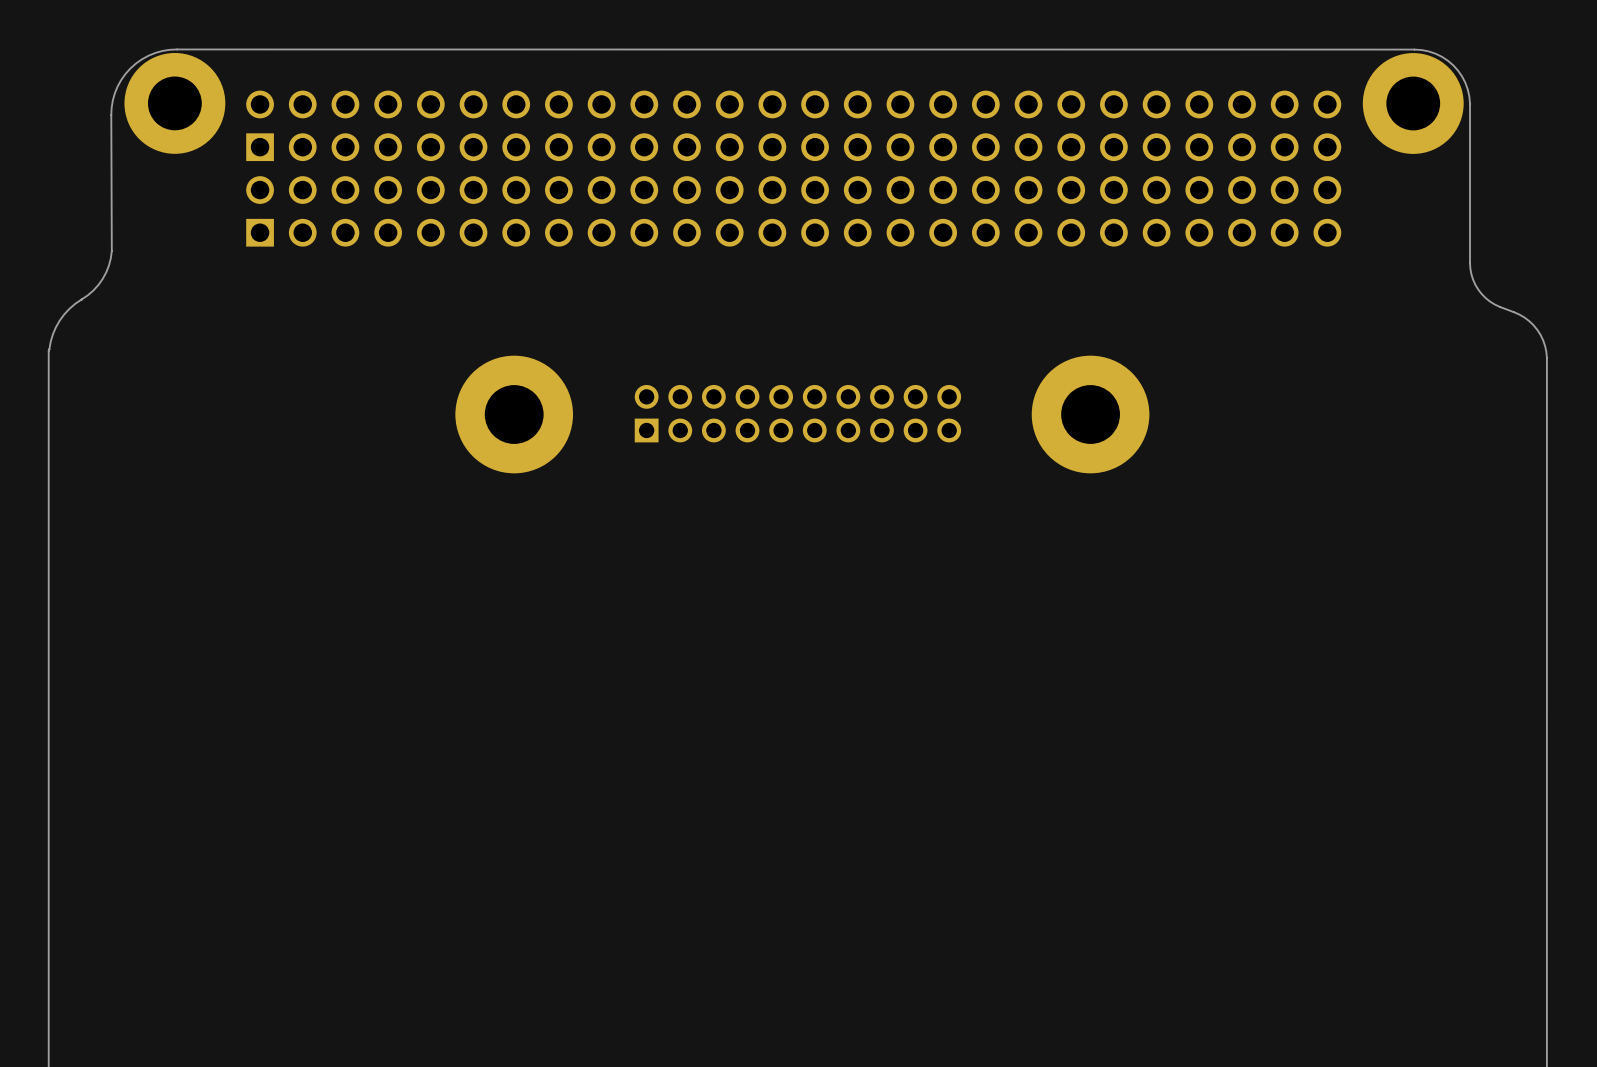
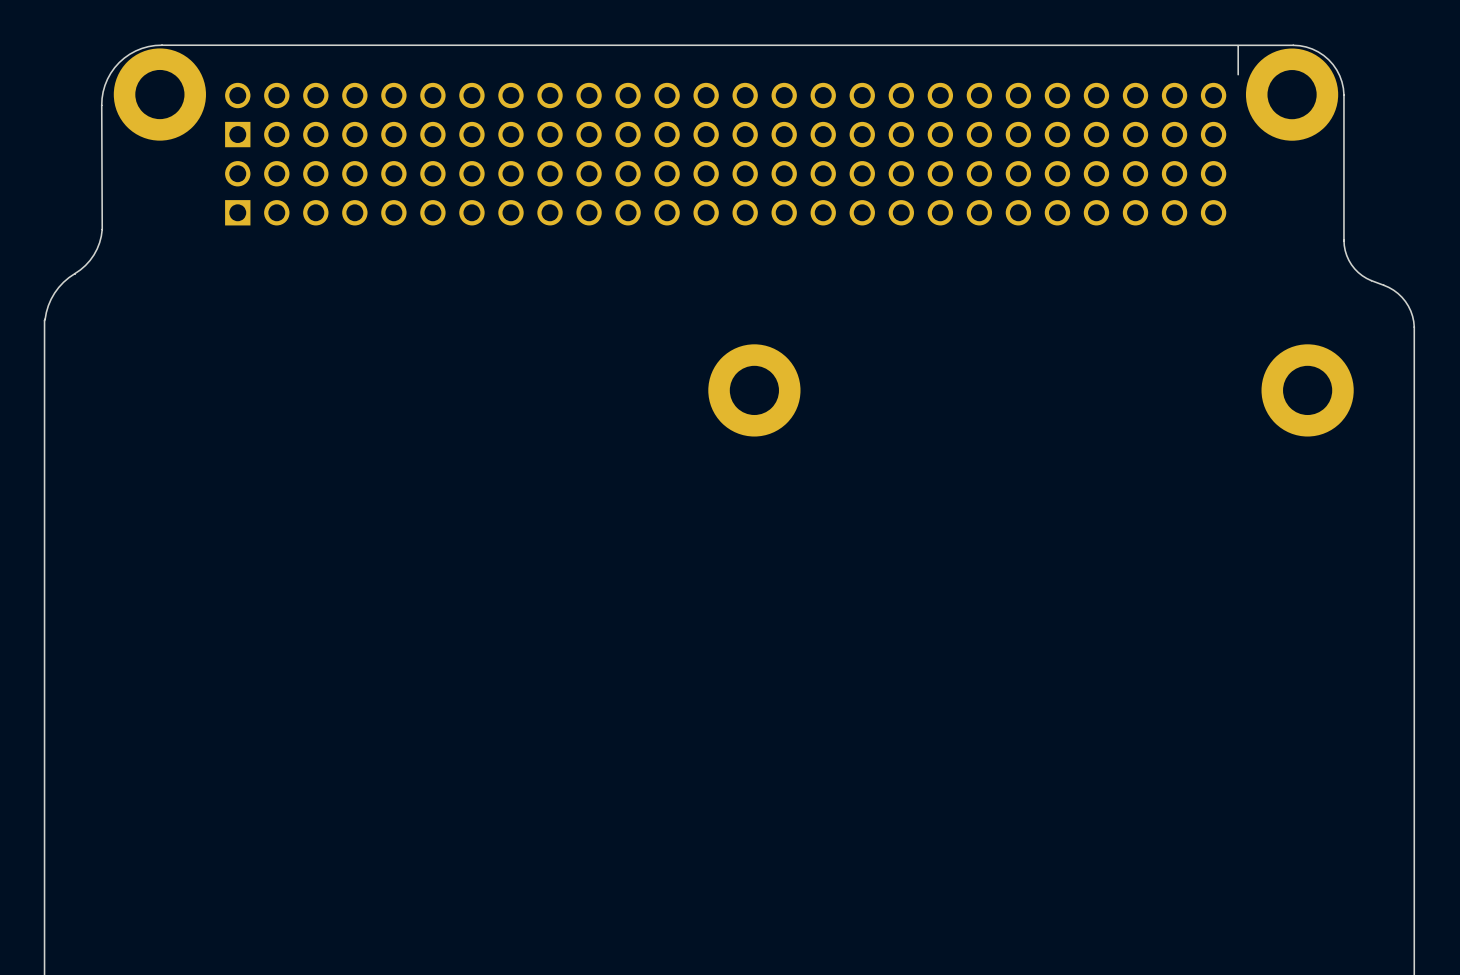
board edge: none -> (1238, 45) (1238, 74)
part: (797, 413) -> none
part: (514, 414) -> none
part: (1090, 414) -> none
part: none -> (754, 390)
part: none -> (1307, 390)

